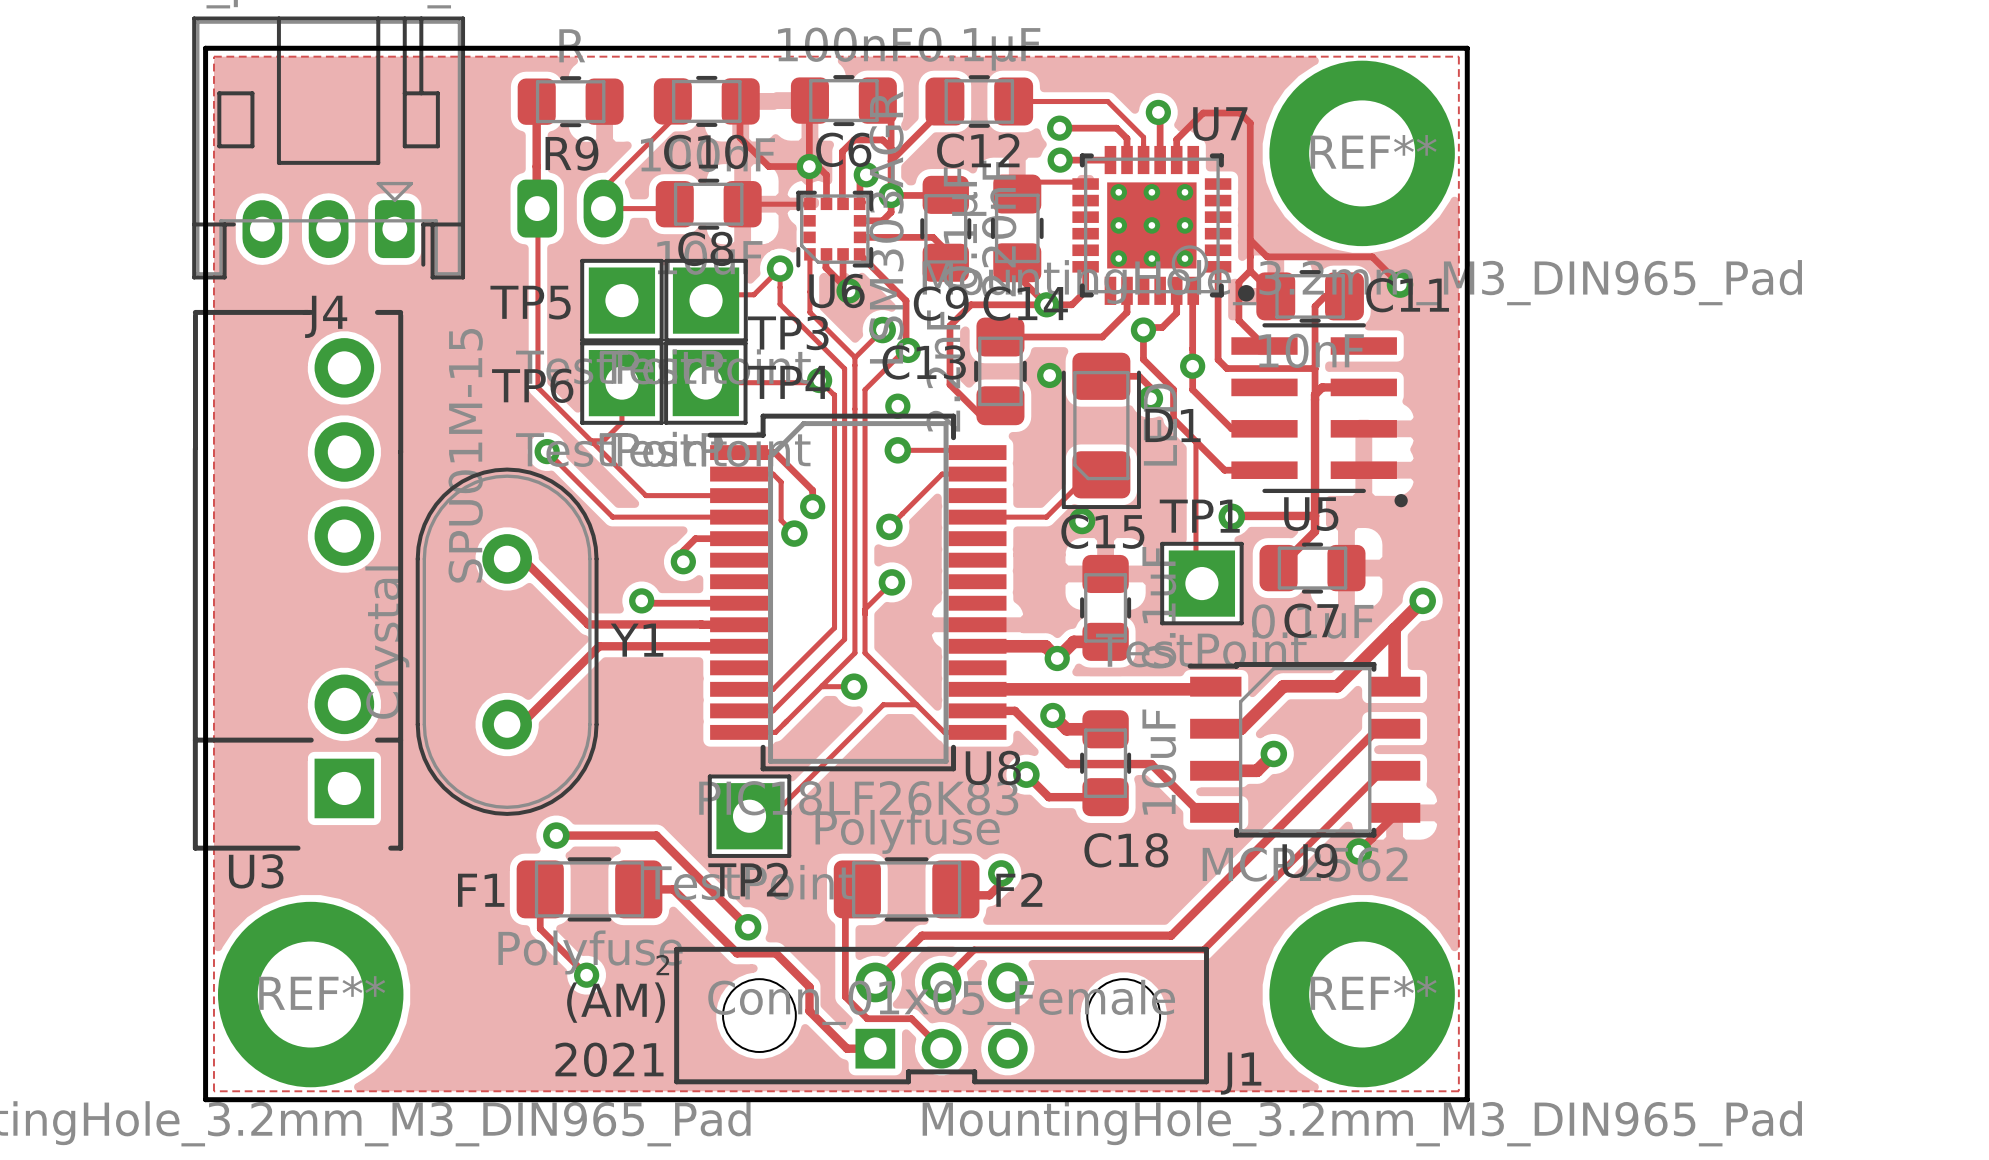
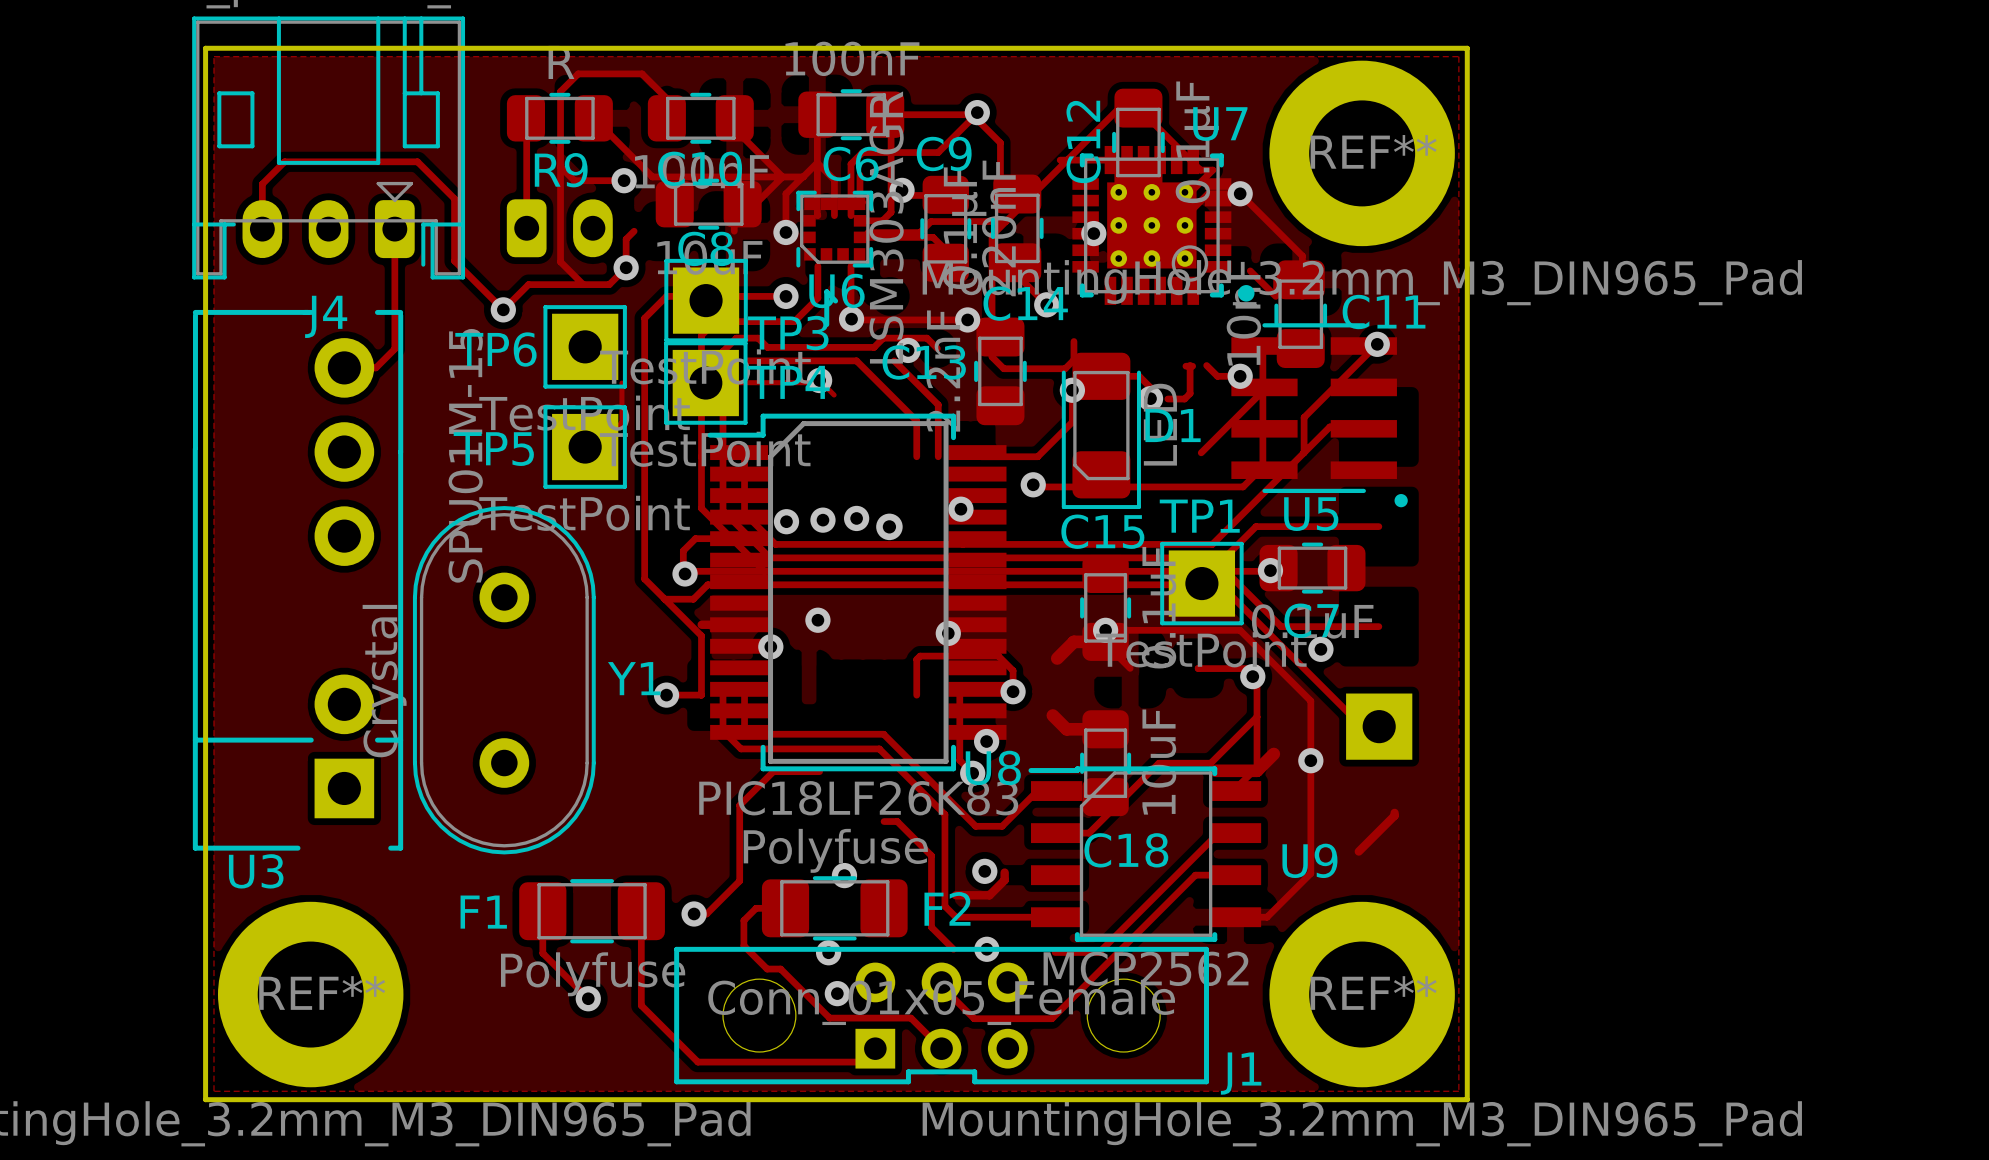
C6 position: (843, 100) -> (851, 114)
R9 position: (570, 101) -> (559, 118)
C10 position: (706, 101) -> (700, 118)
C12 rotation: 0° (979, 101) -> 90° clockwise (1138, 142)
C12 position: (979, 101) -> (1138, 142)
track: (1013, 101) (1107, 101) (1143, 137) (1143, 160) -> none
track: (740, 107) (740, 137) (768, 166) (817, 166) (826, 175) (826, 203) -> none
track: (810, 107) (809, 203) (810, 202) -> none
track: (941, 107) (945, 107) (891, 161) -> none
via: none -> (977, 112)
track: (1158, 112) (1160, 114) (1160, 160) -> none
via: (1158, 112) -> none
track: none -> (817, 114) (817, 215)
track: none -> (885, 114) (972, 114) (1000, 142) (1000, 185) (1021, 206)
track: none -> (974, 116) (938, 152) (862, 152) (851, 164) (851, 215)
track: none -> (525, 118) (526, 228)
track: none -> (593, 118) (652, 176) (803, 176) (817, 162) (834, 180) (834, 215)
track: none -> (666, 118) (666, 98) (642, 73) (578, 73) (560, 91) (560, 261) (583, 284)
track: none -> (734, 118) (734, 129) (782, 176) (734, 225) (734, 231)
track: (536, 119) (536, 227) -> none
track: (672, 119) (604, 188) (604, 229) -> none
track: (1059, 128) (1116, 128) (1127, 138) (1127, 160) -> none
via: (1059, 128) -> none
track: (891, 148) (882, 139) (854, 139) (842, 151) (842, 204) -> none
via: (1060, 160) -> none
track: (1176, 160) (1176, 139) (1203, 113) (1240, 113) (1250, 123) (1250, 270) (1238, 282) (1238, 320) (1264, 345) -> none
track: none -> (560, 166) (574, 180) (624, 180)
via: (809, 166) -> none
via: (866, 174) -> none
track: none -> (802, 176) (785, 193) (785, 232)
via: none -> (624, 180)
track: (1017, 182) (1083, 182) (1085, 184) -> none
via: none -> (1240, 193)
via position: (891, 195) -> (902, 190)
track: (674, 204) (670, 208) (603, 208) -> none
track: (742, 204) (809, 204) -> none
part position: (570, 208) -> (559, 228)
track: (537, 217) (537, 387) (645, 495) (739, 495) -> none
track: none -> (1005, 221) (931, 221) (919, 232) (867, 232)
track: none -> (262, 229) (262, 184) (284, 161) (417, 161) (454, 198) (454, 261) (503, 309) (528, 284) (609, 284) (626, 267) (626, 239) (634, 231)
track: none -> (394, 229) (394, 348) (375, 367) (344, 367)
via: none -> (785, 232)
via: none -> (1093, 233)
track: none -> (1173, 234) (1173, 209) (1212, 170) (1200, 170) (1138, 108) (1119, 108) (992, 235) (992, 356) (1003, 368) (1065, 368) (1073, 360) (1073, 341)
track: none -> (1190, 234) (1190, 211) (1208, 193) (1240, 193) (1302, 256) (1302, 296)
track: (1250, 240) (1267, 256) (1372, 256) (1399, 284) -> none
track: (825, 254) (825, 267) (849, 290) -> none
track: (843, 254) (843, 284) -> none
track: (859, 254) (906, 300) (906, 348) (865, 389) (865, 653) (944, 732) (977, 732) -> none
track: (809, 256) (809, 312) (854, 357) (854, 653) (775, 732) (739, 732) -> none
track: none -> (817, 266) (817, 298) (794, 321) (715, 321) (701, 335) (701, 508) (764, 571)
track: none -> (851, 266) (852, 319) (967, 319)
track: (1085, 266) (1085, 291) (1071, 304) (971, 304) (949, 325) (949, 384) (983, 418) -> none
track: (1218, 266) (1218, 359) (1226, 368) (1314, 368) -> none
via: none -> (626, 267)
via: (780, 268) -> none
via: (1399, 284) -> none
via position: (849, 290) -> (851, 319)
track: (1127, 290) (1127, 312) (1102, 337) (1000, 337) -> none
track: (1176, 290) (1176, 313) (1162, 327) (1143, 327) -> none
track: (1193, 291) (1192, 389) (1231, 428) (1264, 428) -> none
track: (705, 294) (753, 294) (780, 268) (780, 304) (844, 368) (844, 639) (773, 710) (739, 710) -> none
via: none -> (785, 296)
track: none -> (791, 296) (666, 296) (644, 318) (644, 579) (701, 635) (701, 695) (666, 695)
C11 rotation: 0° (1310, 296) -> 90° clockwise (1300, 314)
track: (1344, 296) (1325, 296) (1315, 306) (1315, 399) -> none
TP5 position: (621, 300) -> (585, 447)
line: none -> (835, 301) (826, 291) (826, 324)
C9 name position: C9 (941, 303) -> C9 (944, 153)
via: none -> (503, 309)
via: none -> (967, 319)
track: (882, 330) (854, 357) -> none
via: (882, 330) -> none
track: (1143, 330) (1143, 359) (1173, 389) (1173, 419) (1224, 470) (1264, 470) -> none
via: (1143, 330) -> none
track: none -> (1251, 341) (1262, 352) (1262, 467) (1243, 486) (1035, 486) (1033, 484)
track: none -> (1377, 344) (1304, 417) (1304, 452)
via: none -> (1377, 344)
track: none -> (937, 348) (926, 338) (883, 338) (874, 347) (767, 347) (758, 338) (736, 338) (723, 351) (723, 510) (770, 557) (1224, 557) (1256, 526) (1378, 526)
track: none -> (747, 360) (856, 360) (916, 421) (916, 456)
track: none -> (894, 360) (938, 404) (938, 456)
track: none -> (1190, 365) (1190, 393) (1184, 399) (1167, 399)
track: none -> (1206, 365) (1217, 376) (1240, 376)
via position: (1192, 366) -> (1240, 376)
via position: (1049, 375) -> (1072, 390)
TP6 position: (621, 383) -> (585, 346)
track: (1363, 387) (1322, 387) (1315, 394) (1315, 531) (1278, 568) -> none
track: none -> (1072, 390) (1072, 422) (1037, 456) (981, 456)
track: none -> (1262, 391) (1201, 452)
track: (834, 395) (834, 627) (773, 689) (739, 689) -> none
via: (897, 406) -> none
track: none -> (1378, 426) (1329, 426) (1212, 544) (775, 544) (744, 513) (744, 456)
track: (1195, 441) (1195, 577) (1201, 583) -> none
track: (897, 450) (975, 450) (977, 452) -> none
via: (897, 450) -> none
track: (547, 451) (612, 517) (739, 517) -> none
via: (547, 451) -> none
track: (739, 452) (774, 452) (812, 490) (812, 506) -> none
track: (1101, 462) (1046, 517) (977, 517) -> none
track: (739, 474) (773, 474) (781, 482) (781, 520) (794, 533) -> none
track: (977, 474) (942, 474) (889, 526) -> none
via: none -> (1033, 484)
via position: (812, 506) -> (822, 520)
via: none -> (960, 509)
track: (1315, 515) (1231, 516) -> none
via: (1231, 516) -> none
via: none -> (856, 518)
via: (1082, 520) -> none
via position: (794, 533) -> (786, 521)
track: (521, 558) (588, 624) (701, 624) -> none
via position: (683, 561) -> (685, 573)
track: none -> (1270, 570) (687, 571) (685, 573)
via: none -> (1270, 570)
track: none -> (1225, 571) (1281, 626) (1378, 626)
track: (891, 582) (865, 609) -> none
via: (891, 582) -> none
track: none -> (664, 599) (693, 599) (707, 584) (1220, 584) (1362, 726) (1379, 726)
track: (641, 600) (644, 603) (739, 603) -> none
via: (641, 600) -> none
track: (1422, 600) (1337, 686) (1283, 686) (1241, 728) (1215, 728) -> none
via: (1422, 600) -> none
via: none -> (817, 620)
track: (1394, 628) (1394, 686) -> none
via: none -> (1105, 630)
via: none -> (948, 633)
Y1 position: (507, 641) -> (504, 680)
track: (739, 646) (599, 646) (521, 723) -> none
via: none -> (770, 646)
track: (977, 646) (1045, 646) (1057, 658) -> none
via: none -> (1320, 649)
via: (1057, 658) -> none
track: none -> (1130, 668) (1103, 641) (1103, 632) (1105, 630) (1240, 630) (1310, 701) (1310, 873) (1267, 917) (1235, 917)
track: none -> (1198, 668) (1257, 668) (1257, 767) (1235, 791)
via: none -> (1252, 676)
track: (822, 685) (854, 686) -> none
via: (854, 686) -> none
track: (1215, 686) (1213, 689) (977, 689) -> none
track: none -> (1013, 691) (1013, 670) (998, 656) (920, 656) (916, 659) (916, 695)
via: none -> (1013, 691)
via: none -> (666, 695)
track: none -> (723, 695) (723, 730) (741, 748) (879, 748) (944, 814) (944, 906) (955, 917) (1056, 917)
track: none -> (744, 695) (744, 728) (750, 734) (883, 734) (975, 826) (1002, 826) (1037, 791) (1056, 791)
track: none -> (959, 695) (959, 760) (972, 773)
track: (916, 704) (883, 704) (749, 837) -> none
track: (977, 710) (1014, 710) (1068, 764) (1151, 764) (1200, 812) (1215, 812) -> none
via: (1052, 715) -> none
track: none -> (1257, 716) (1210, 763) (1158, 763) (1089, 833) (1056, 833)
track: (1394, 728) (1378, 728) (1171, 935) (922, 935) (875, 982) -> none
via: none -> (986, 741)
U9 position: (1303, 749) -> (1144, 854)
via: (1273, 753) -> none
via: none -> (1310, 760)
track: (1394, 770) (1382, 770) (1203, 949) (974, 949) (941, 982) -> (1235, 875) (1195, 875) (1051, 1018) (974, 1018) (941, 986) (941, 982)
track: none -> (819, 771) (773, 771) (739, 805) (739, 880) (706, 913) (694, 913)
via: none -> (972, 773)
track: (1026, 774) (1048, 797) (1105, 797) -> none
via: (1026, 774) -> none
TP2 side: top (749, 816) -> bottom (1379, 726)
track: none -> (884, 821) (897, 821) (931, 855) (931, 927) (953, 949)
track: none -> (1235, 833) (1218, 833) (1099, 952) (1055, 952)
track: (556, 835) (656, 835) (748, 927) -> none
via: (556, 835) -> none
via: (1358, 851) -> none
via position: (1001, 873) -> (984, 871)
via: none -> (844, 875)
track: (540, 889) (540, 928) (586, 975) -> none
F1 position: (589, 889) -> (592, 911)
track: (857, 889) (845, 901) (845, 996) (867, 1018) (911, 1018) -> (785, 908) (756, 908) (743, 920) (743, 945) (767, 969) (780, 969) (829, 1018) (911, 1018)
F2 position: (906, 889) -> (834, 908)
track: (638, 900) (638, 889) (673, 889) (737, 953) (775, 953) (809, 986) (809, 1011) (847, 1048) (875, 1048) -> (641, 911) (641, 1005) (697, 1062) (861, 1062) (875, 1048)
track: none -> (542, 911) (542, 953) (588, 998)
via: none -> (694, 913)
via: (748, 927) -> none
via: none -> (986, 949)
via: none -> (828, 952)
text: 2 (662, 965) -> none
via position: (586, 975) -> (588, 998)
via: none -> (837, 993)
text: (AM) (616, 1002) -> none
text: 2021 (609, 1059) -> none

